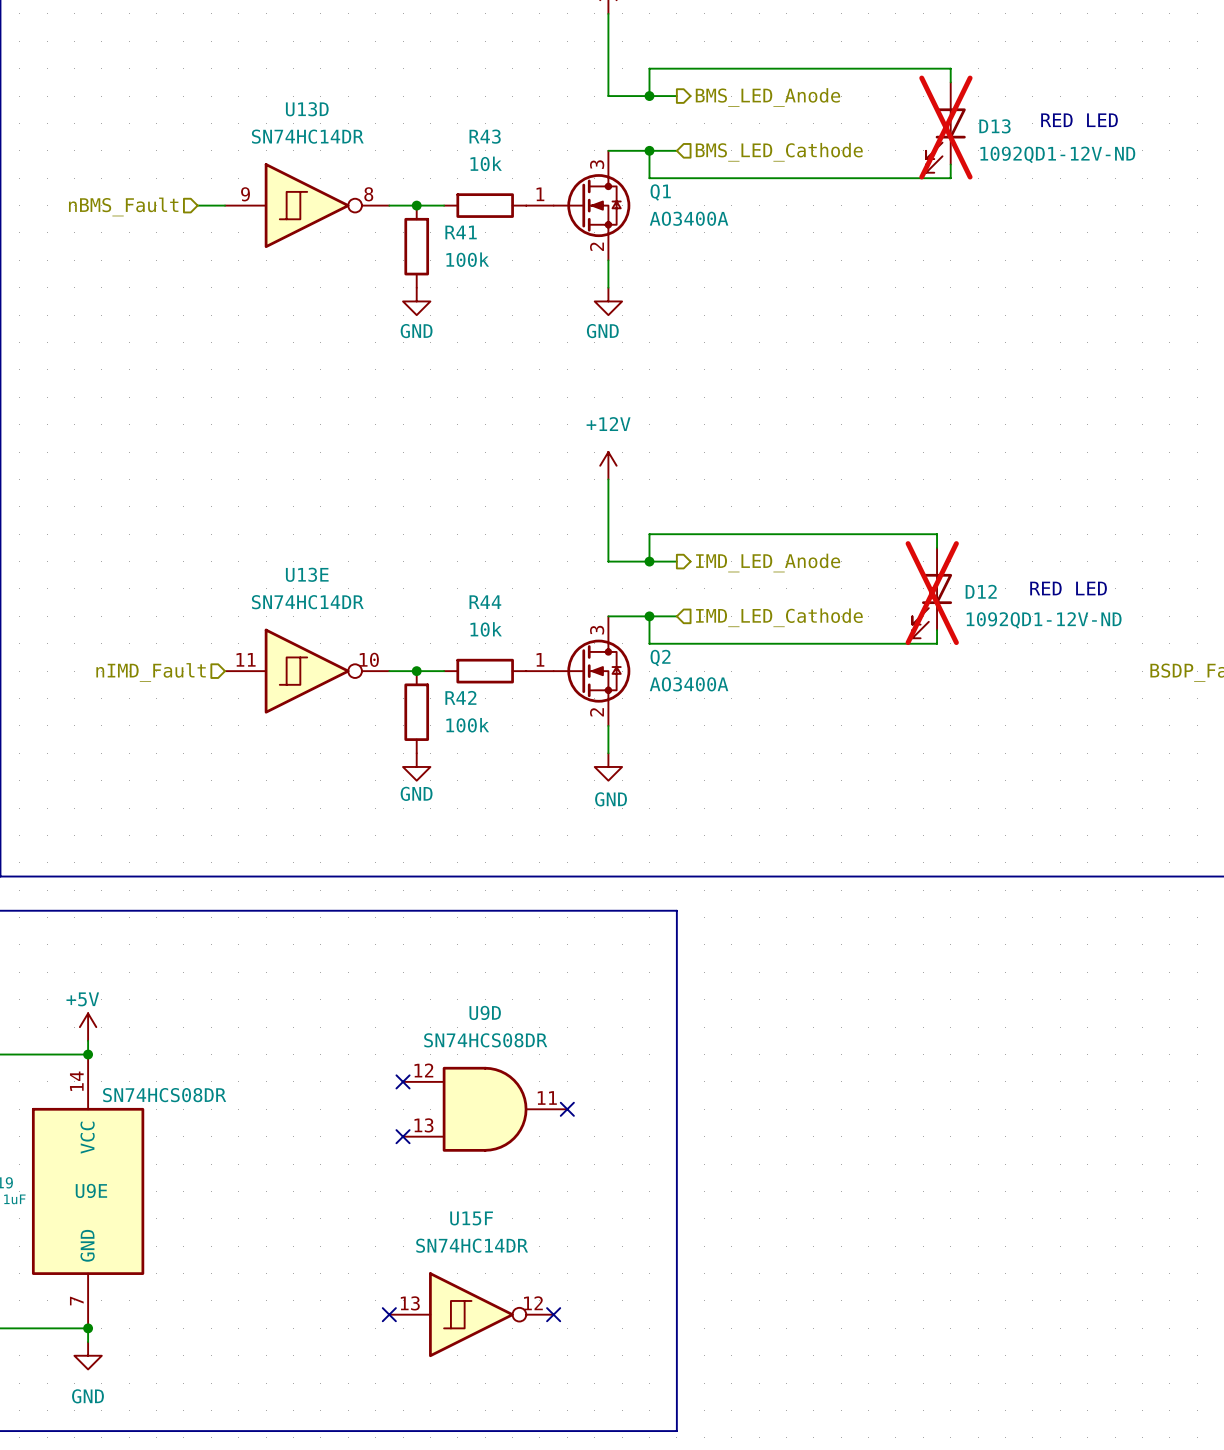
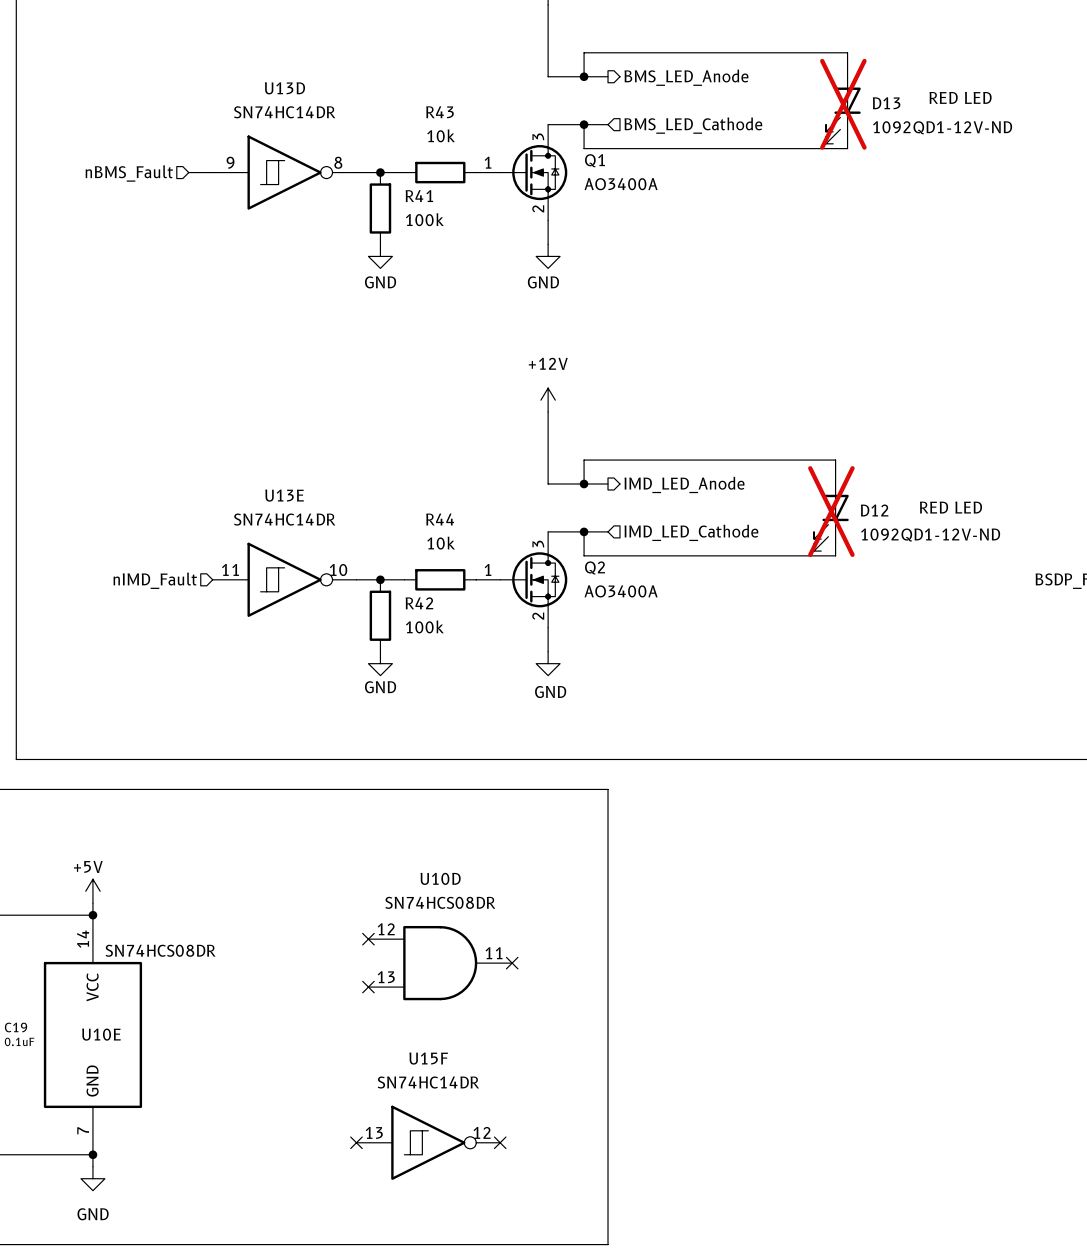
U9D name: U9D (485, 1012) -> U10D (440, 878)
U9E name: U9E (91, 1190) -> U10E (101, 1034)

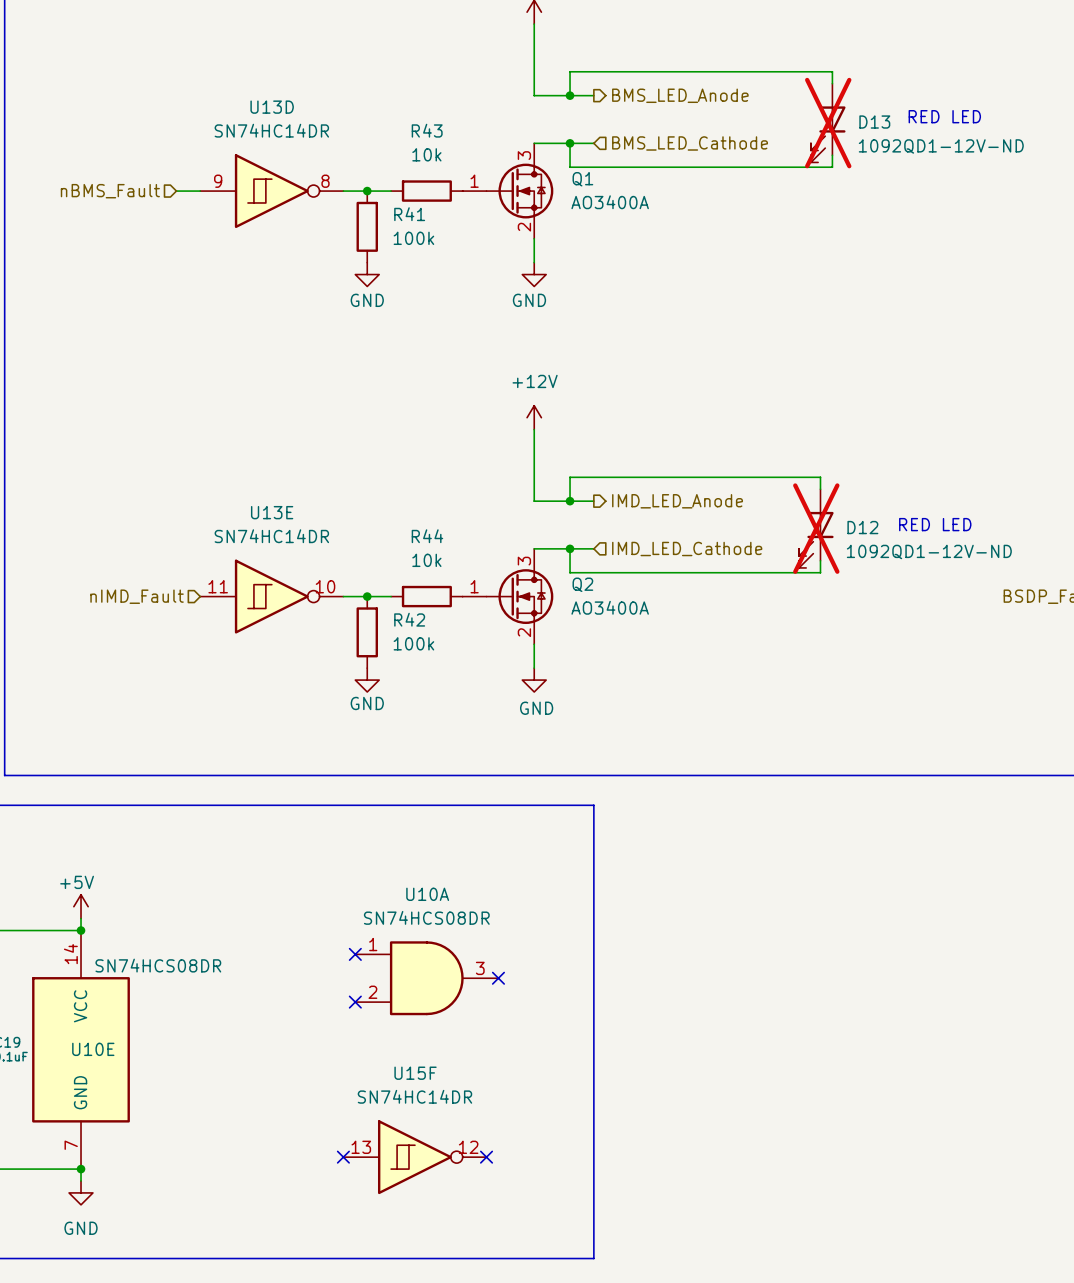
U10D name: U10D (440, 878) -> U10A (427, 894)
U10D pin number: 12 (386, 929) -> 1 (373, 944)
U10D pin number: 11 (494, 953) -> 3 (480, 968)
U10D pin number: 13 (386, 977) -> 2 (372, 992)

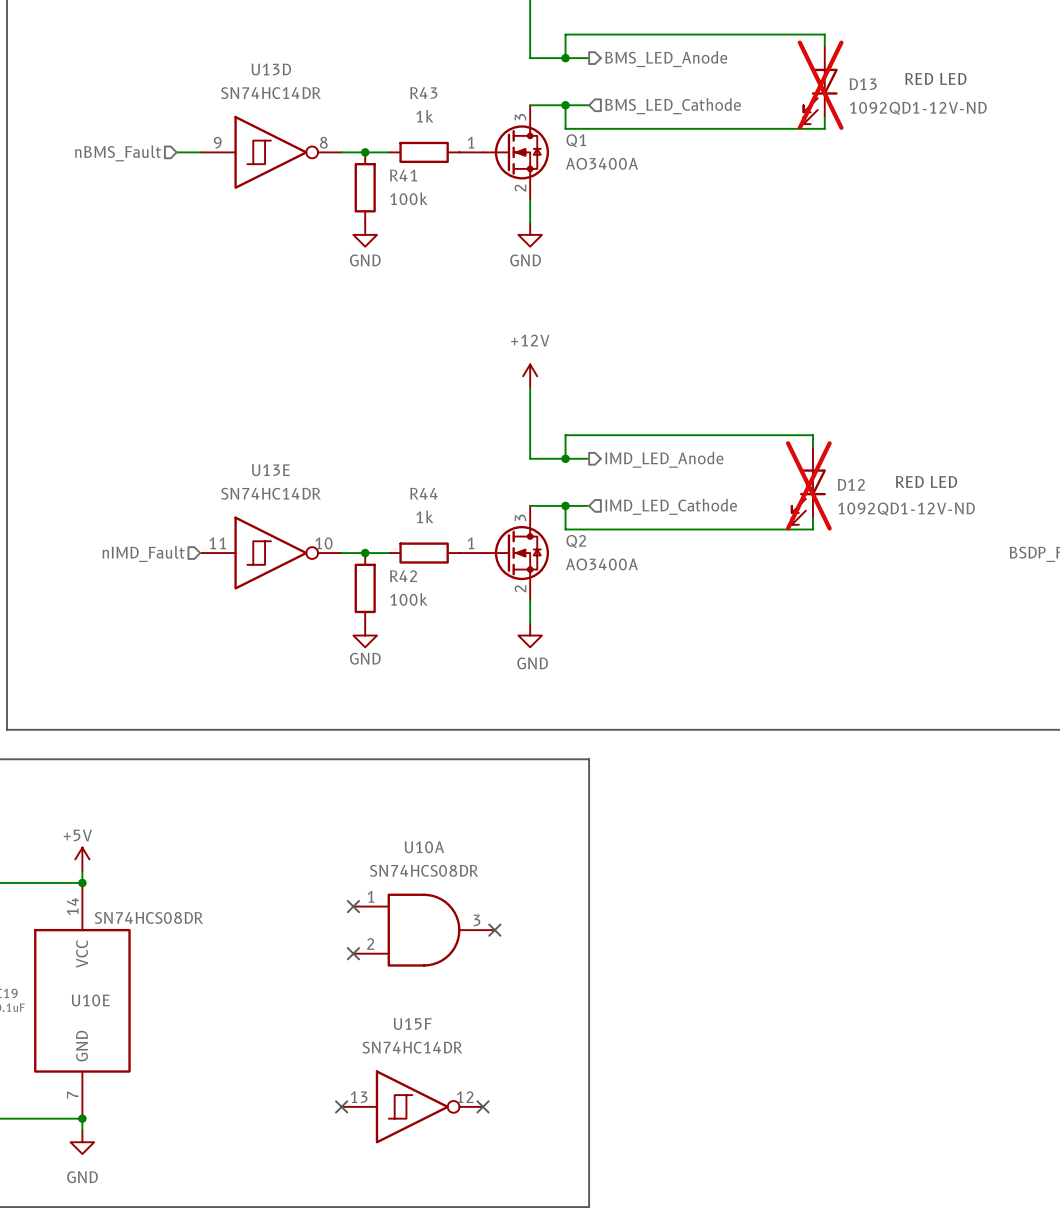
R43 value: 10k (426, 154) -> 1k (424, 116)
R44 value: 10k (426, 560) -> 1k (424, 516)

